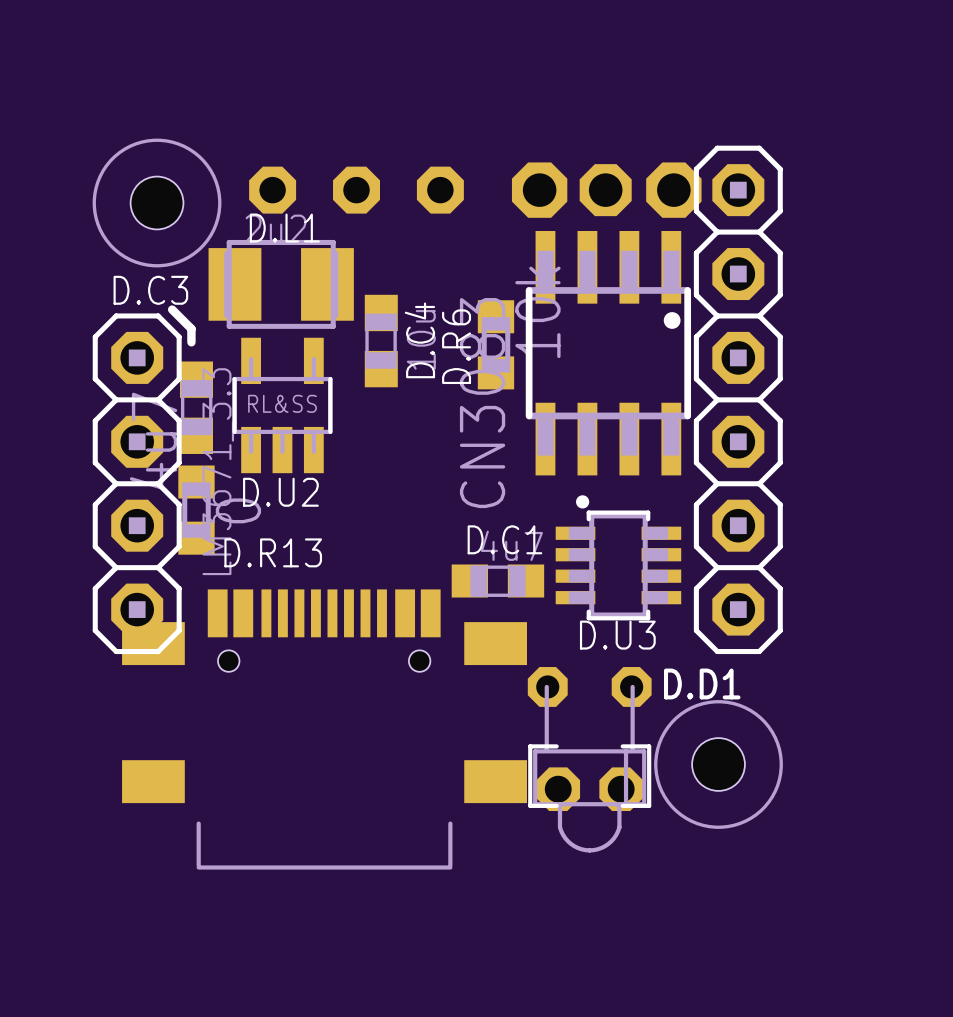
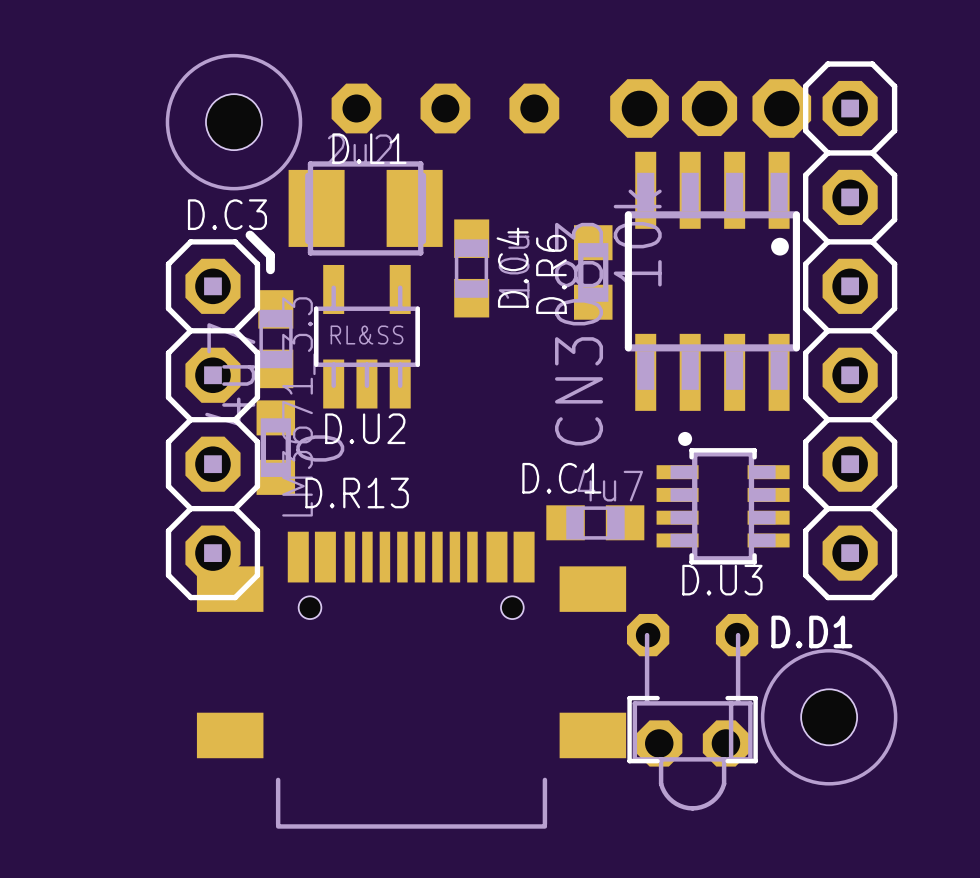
D.C1 name position: D.C1 (504, 539) -> D.C1 (561, 478)

